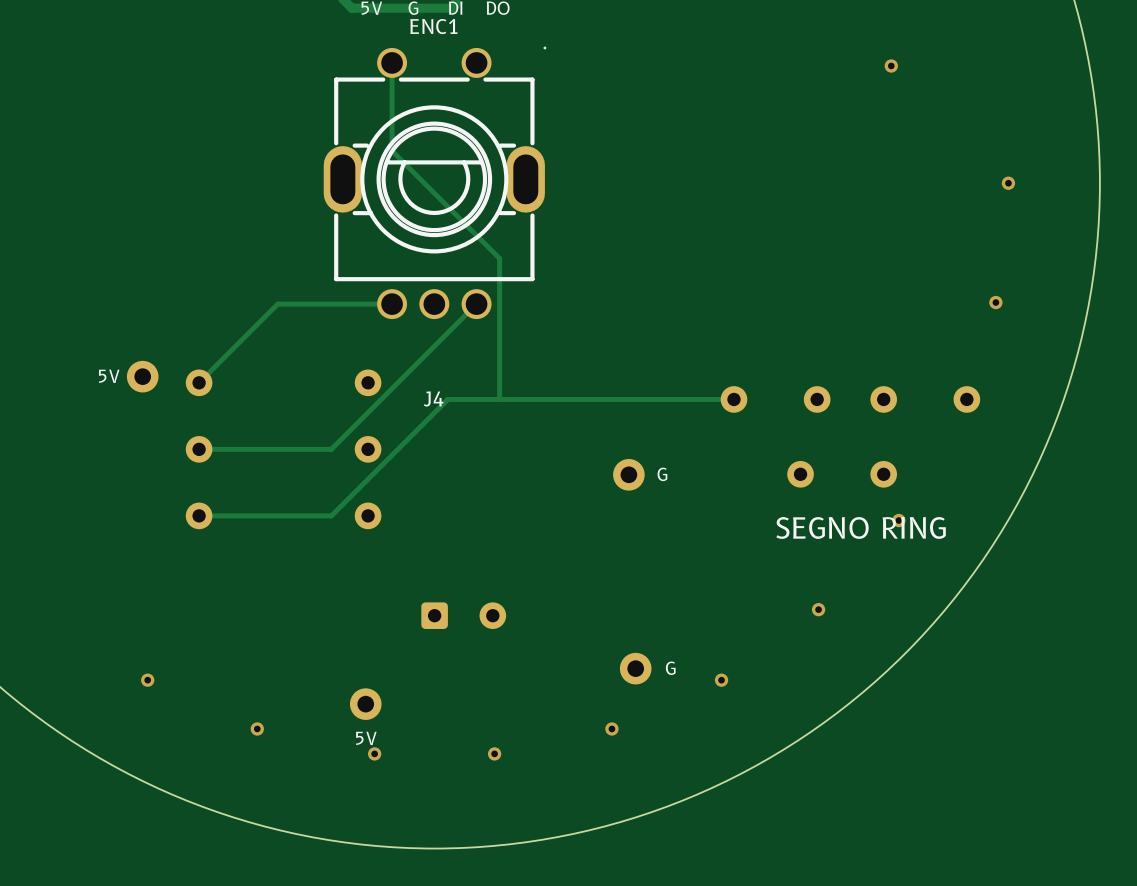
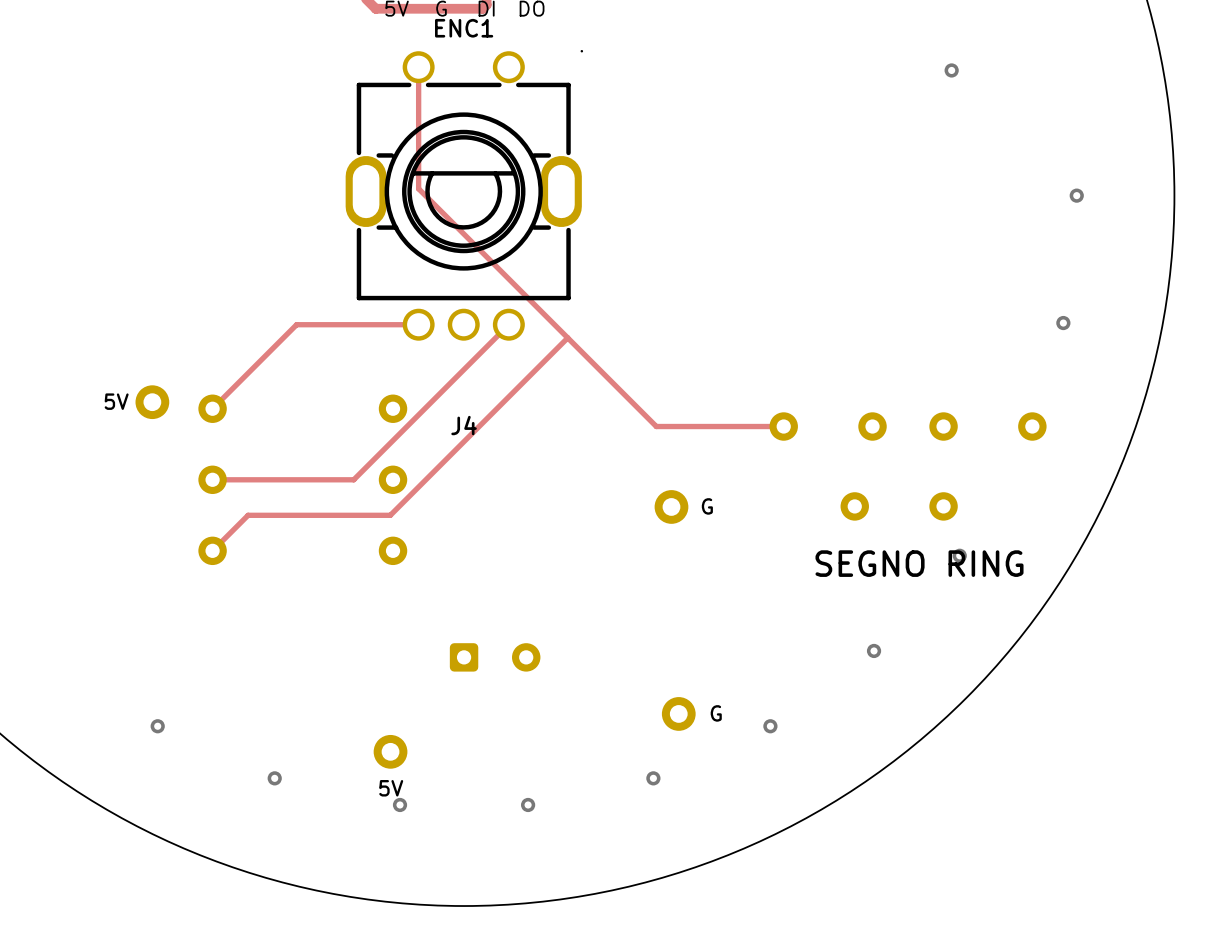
track: (392, 150) (499, 258) (499, 399) -> (418, 161) (418, 188) (656, 426)
track: (614, 399) (447, 399) (331, 515) (199, 515) -> (567, 337) (390, 515) (248, 515) (212, 550)

